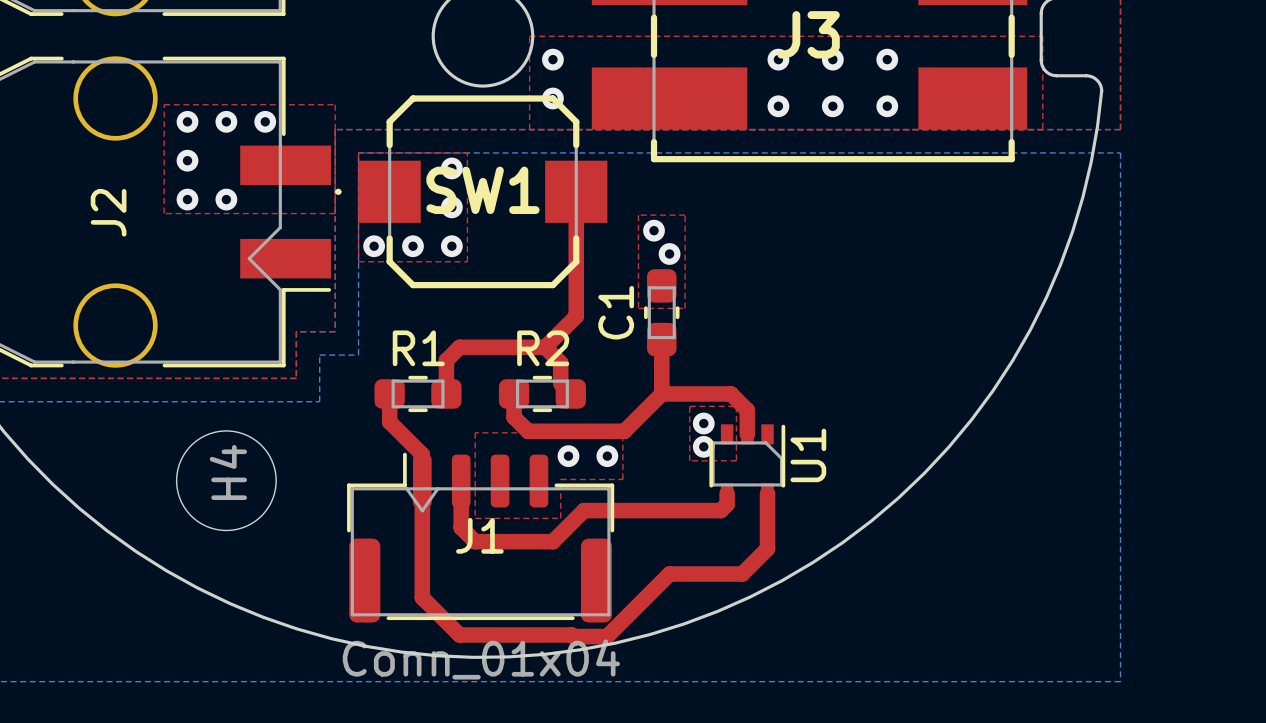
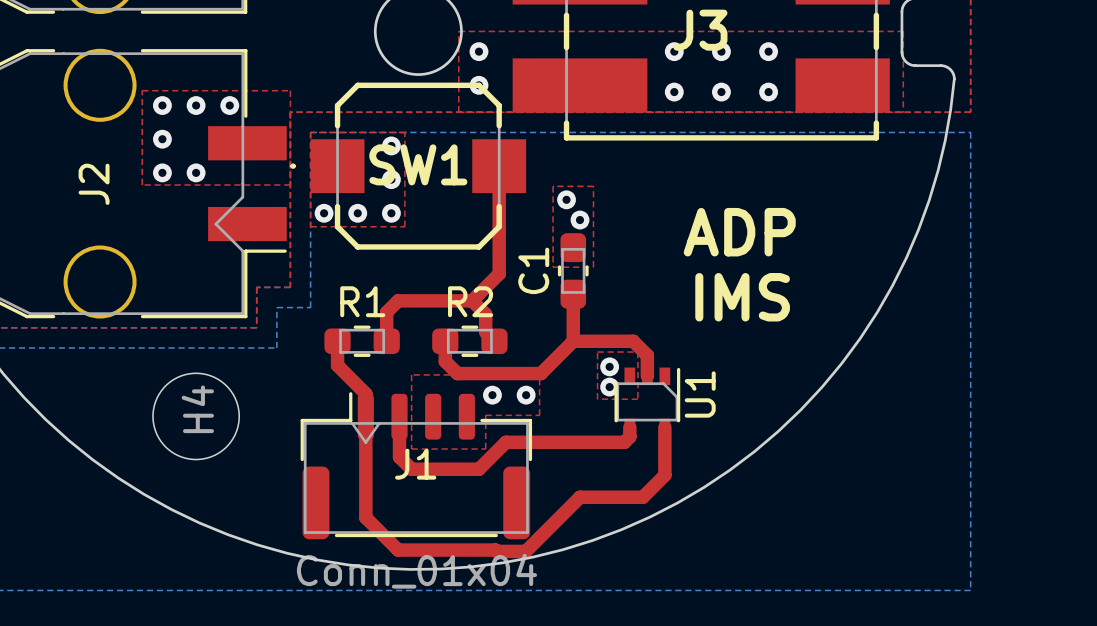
text: none -> ADP (739, 232)
text: none -> IMS (742, 297)

